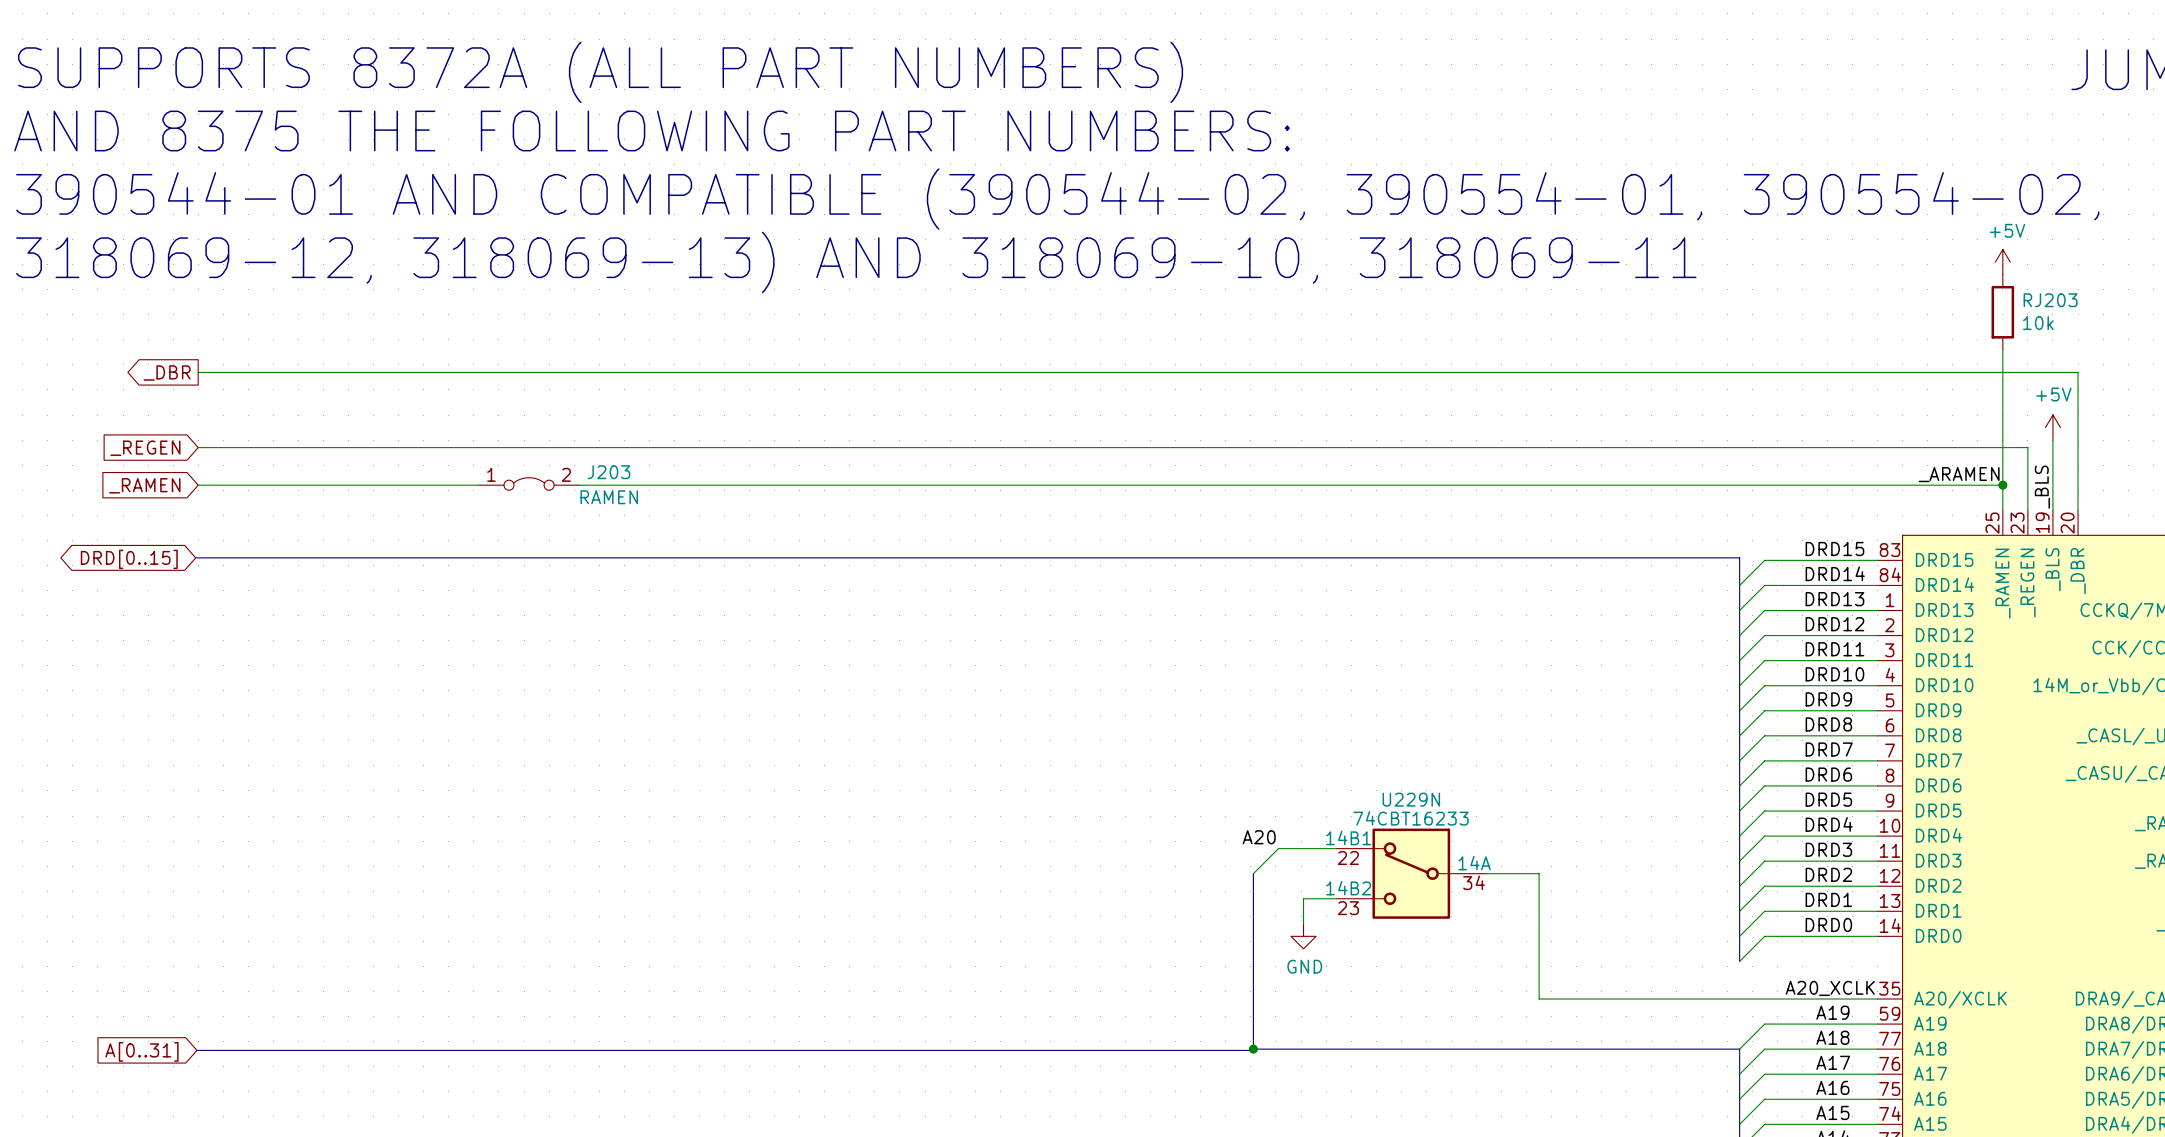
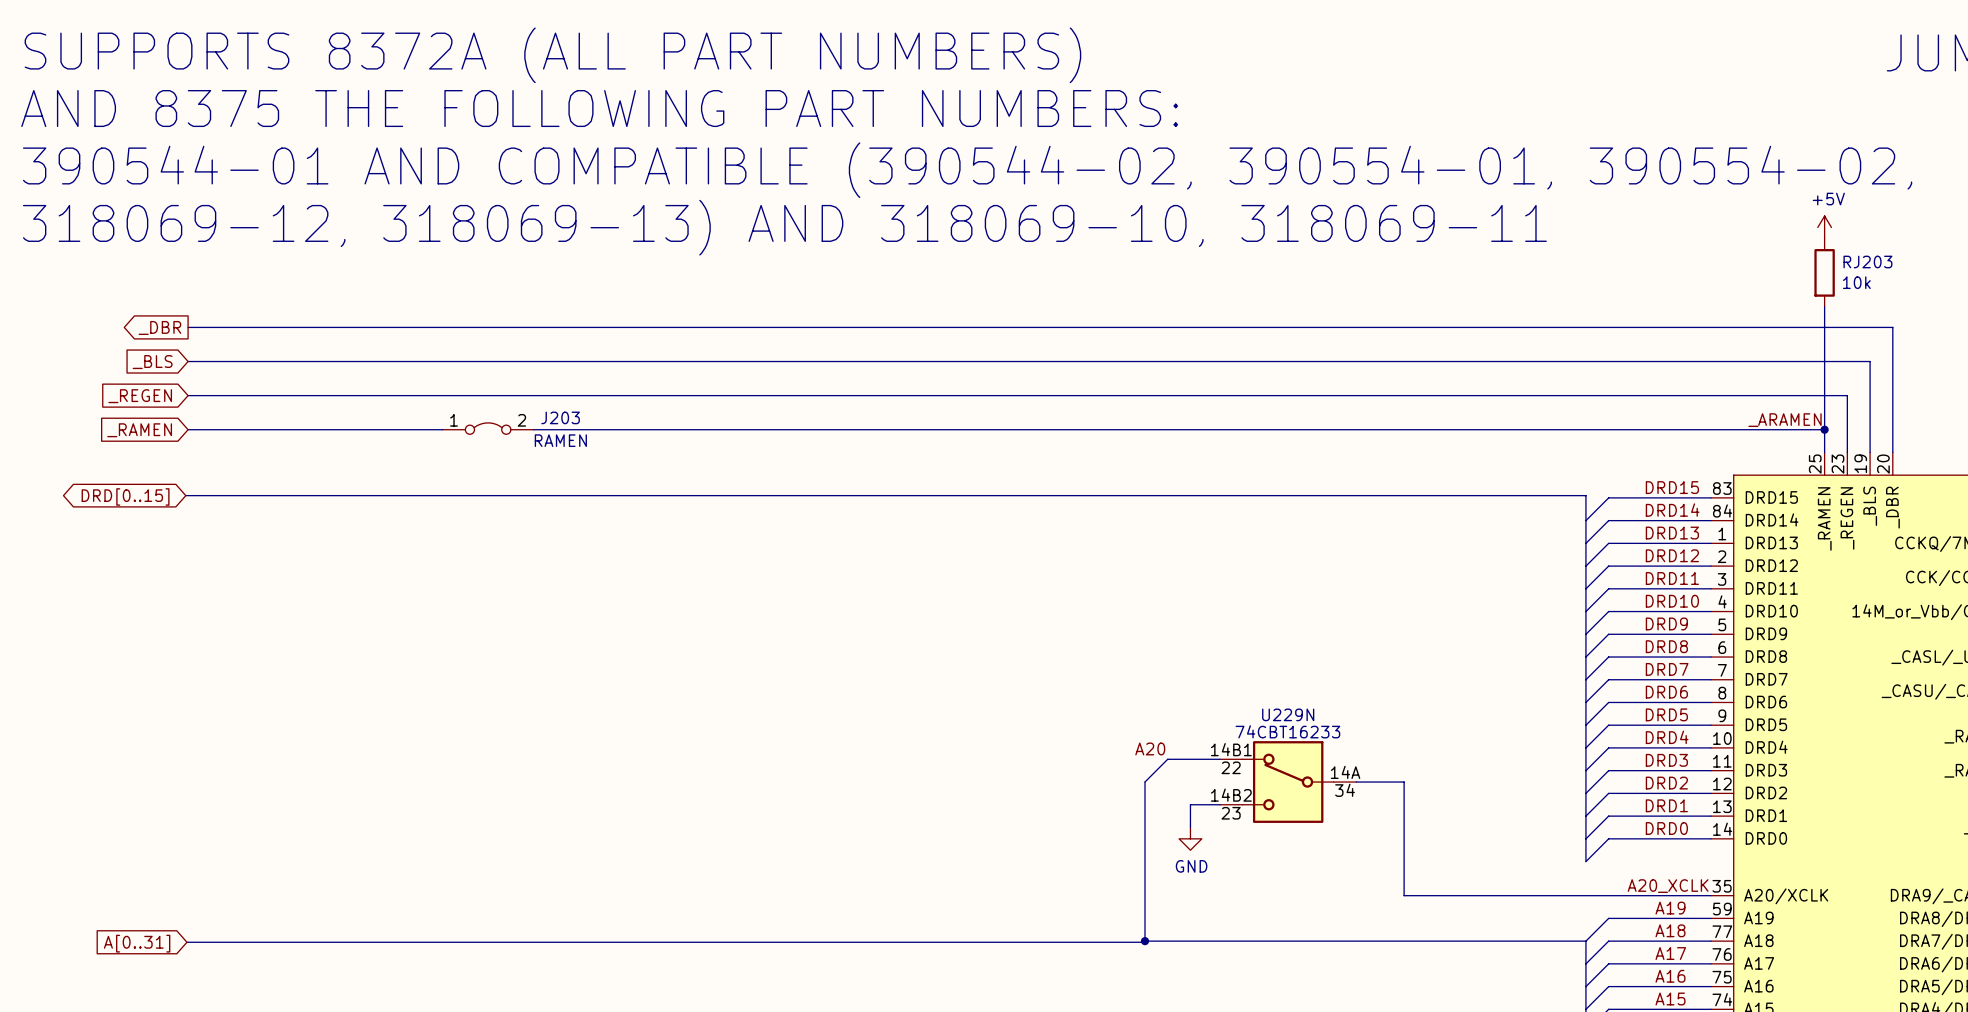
global label: none -> _BLS (152, 362)
wire: none -> (188, 361) (1870, 361) (1870, 388)
power symbol: +5V (2052, 427) -> none
label: _BLS (2042, 487) -> none

